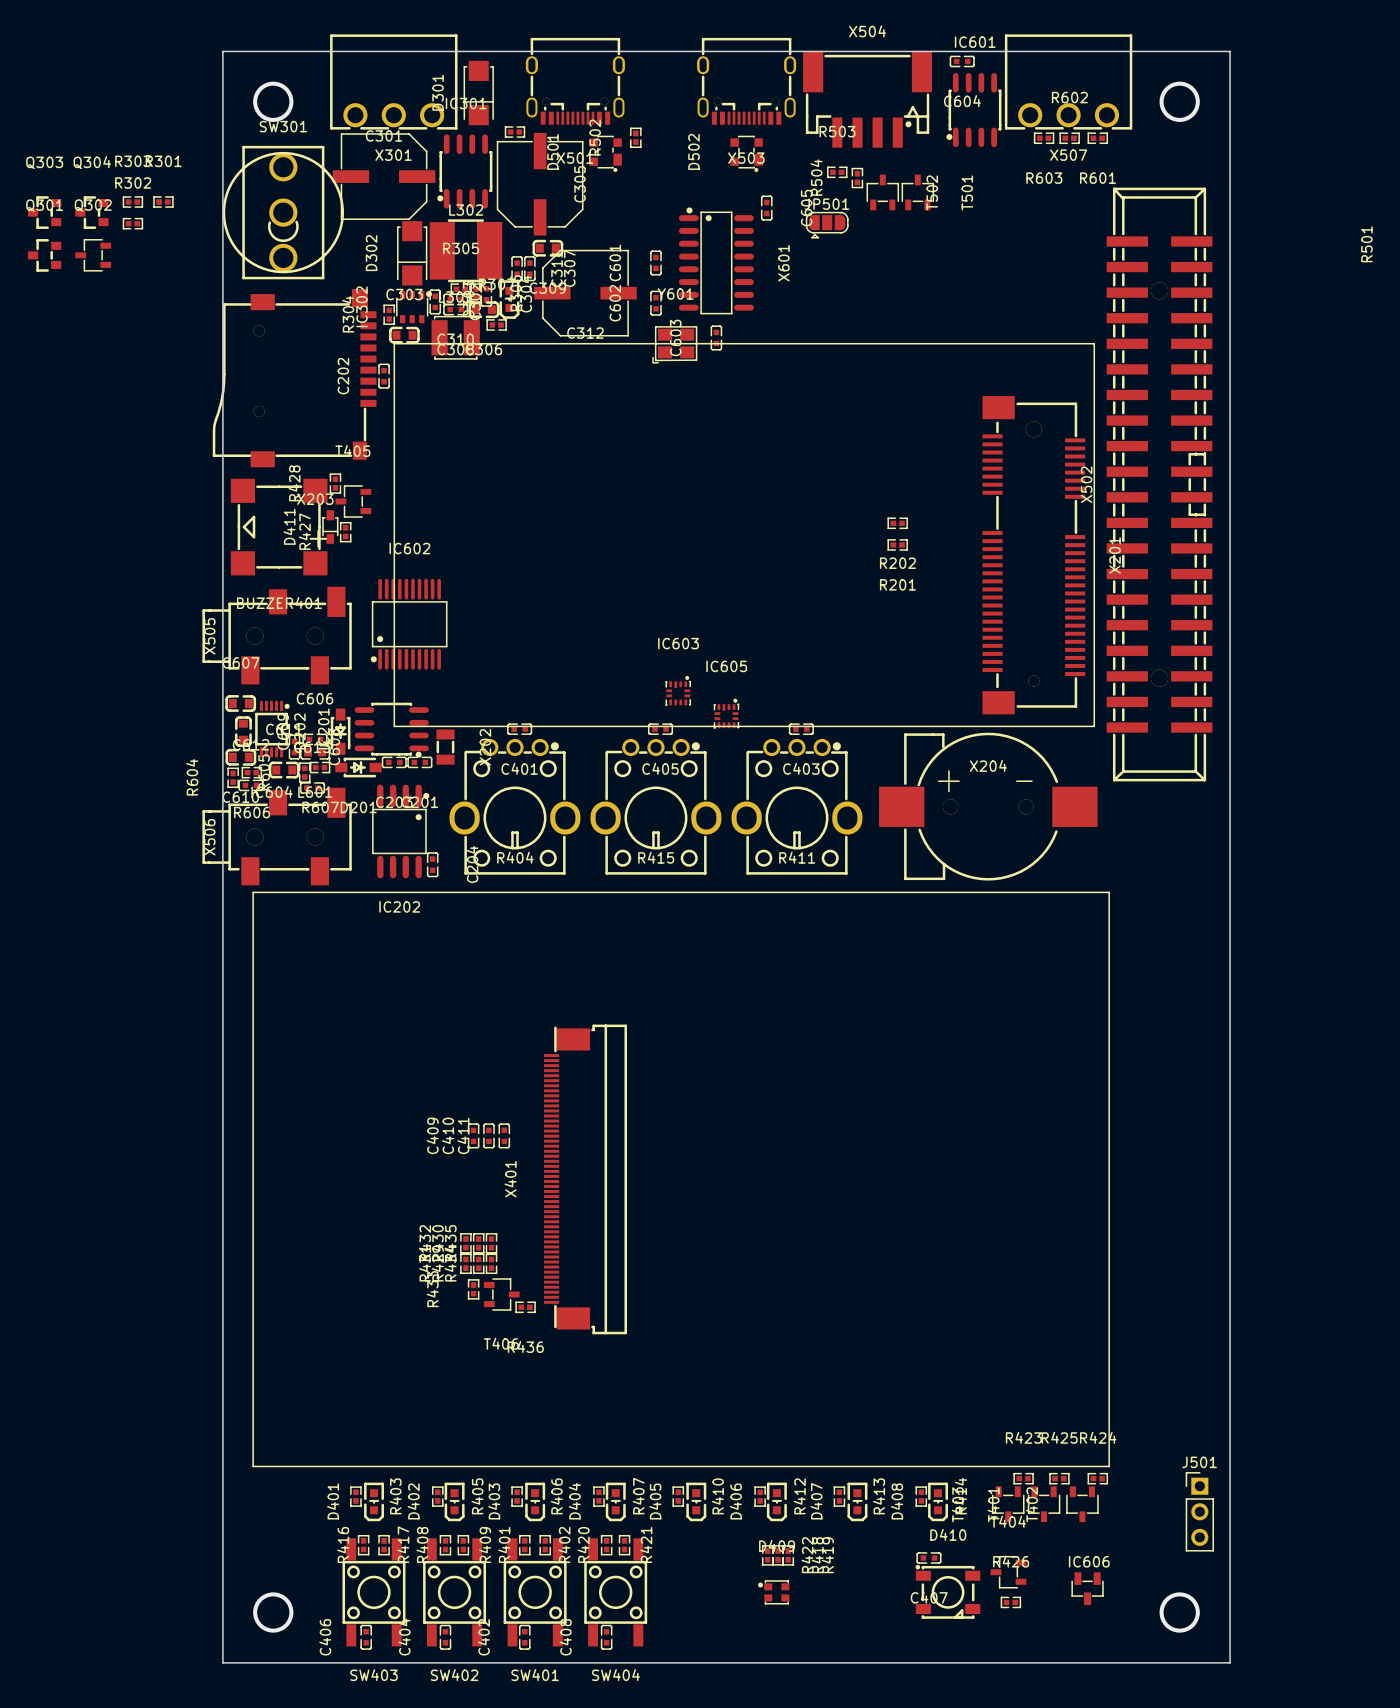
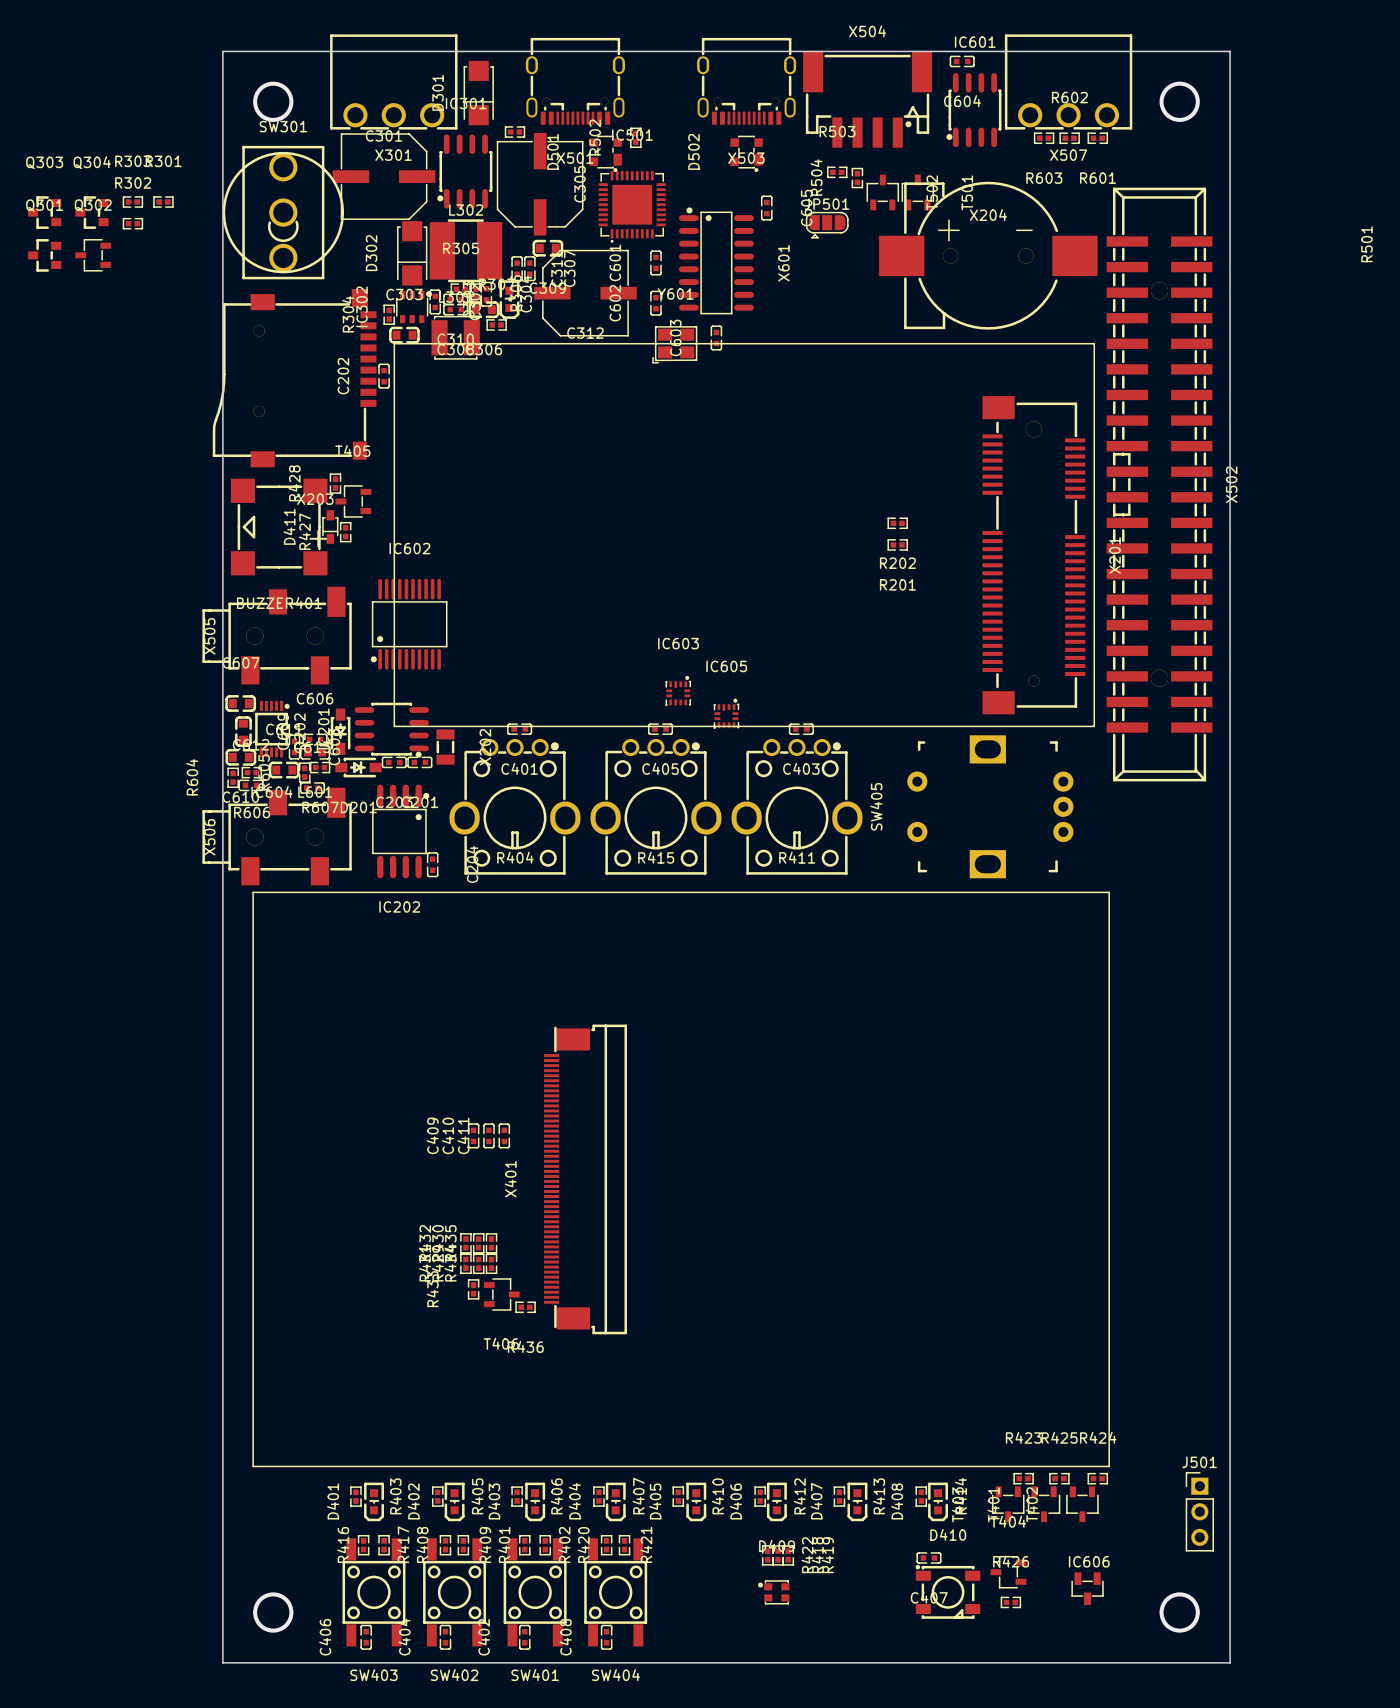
IC501: none -> (632, 206)
X502 rotation: 0° (1159, 484) -> 180° (1159, 484)
X204 position: (988, 806) -> (988, 255)
SW405: none -> (990, 806)

